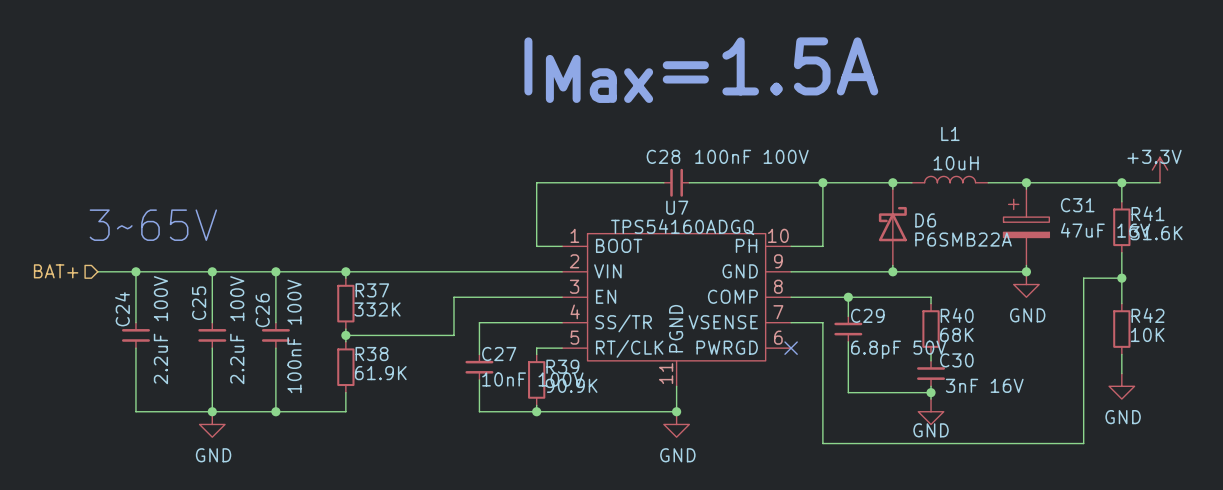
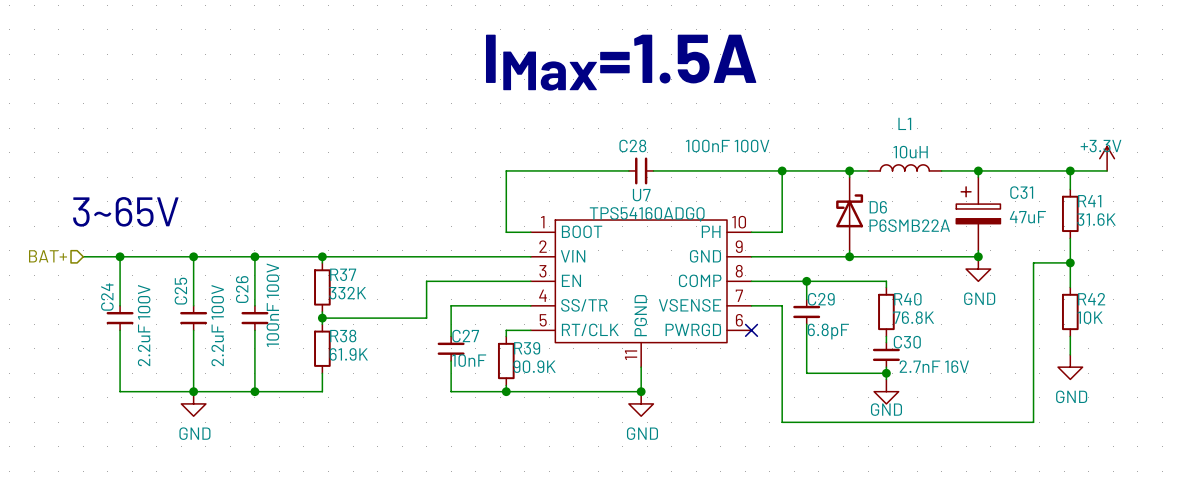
C31 value: 47uF 16V (1105, 230) -> 47uF (1027, 217)
R40 value: 68K (956, 334) -> 76.8K (913, 317)
C29 value: 6.8pF 50V (898, 349) -> 6.8pF (828, 331)
C27 value: 10nF 100V (532, 379) -> 10nF (469, 360)
C30 value: 3nF 16V (984, 385) -> 2.7nF 16V (934, 366)

